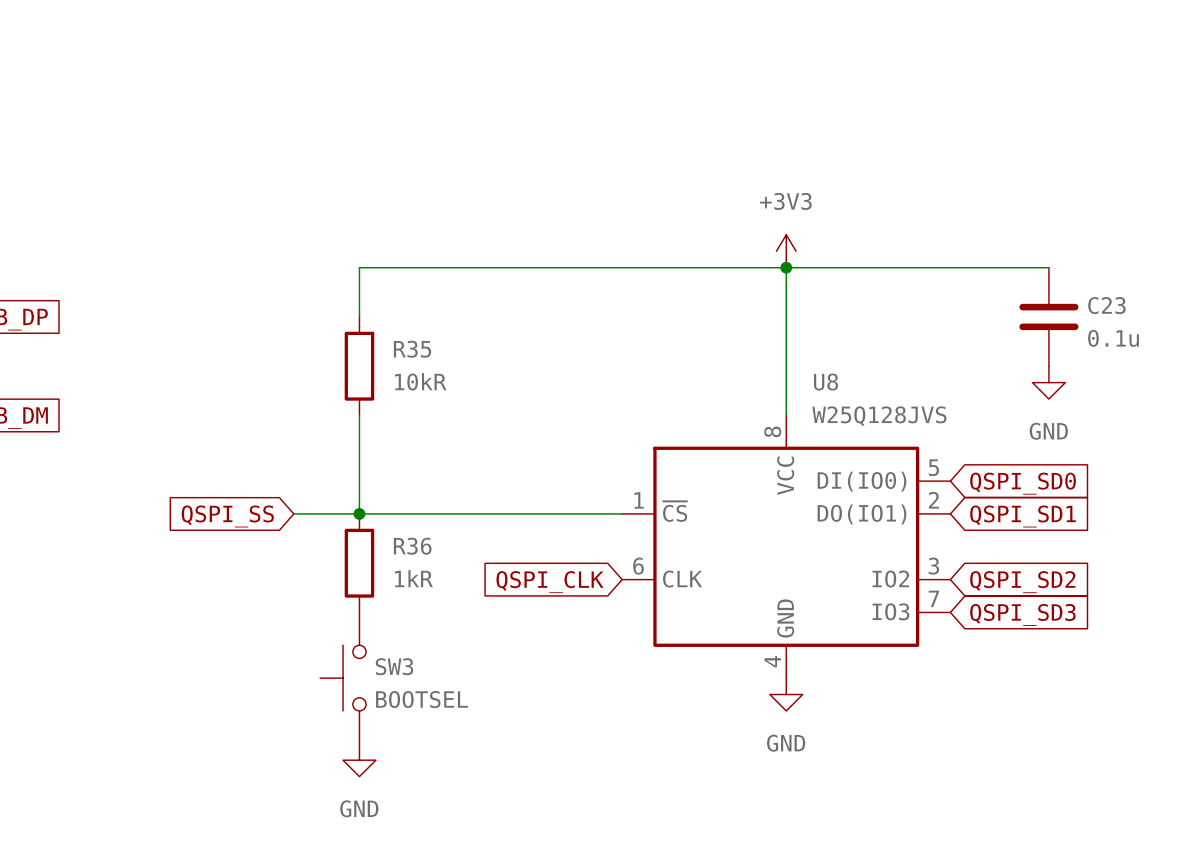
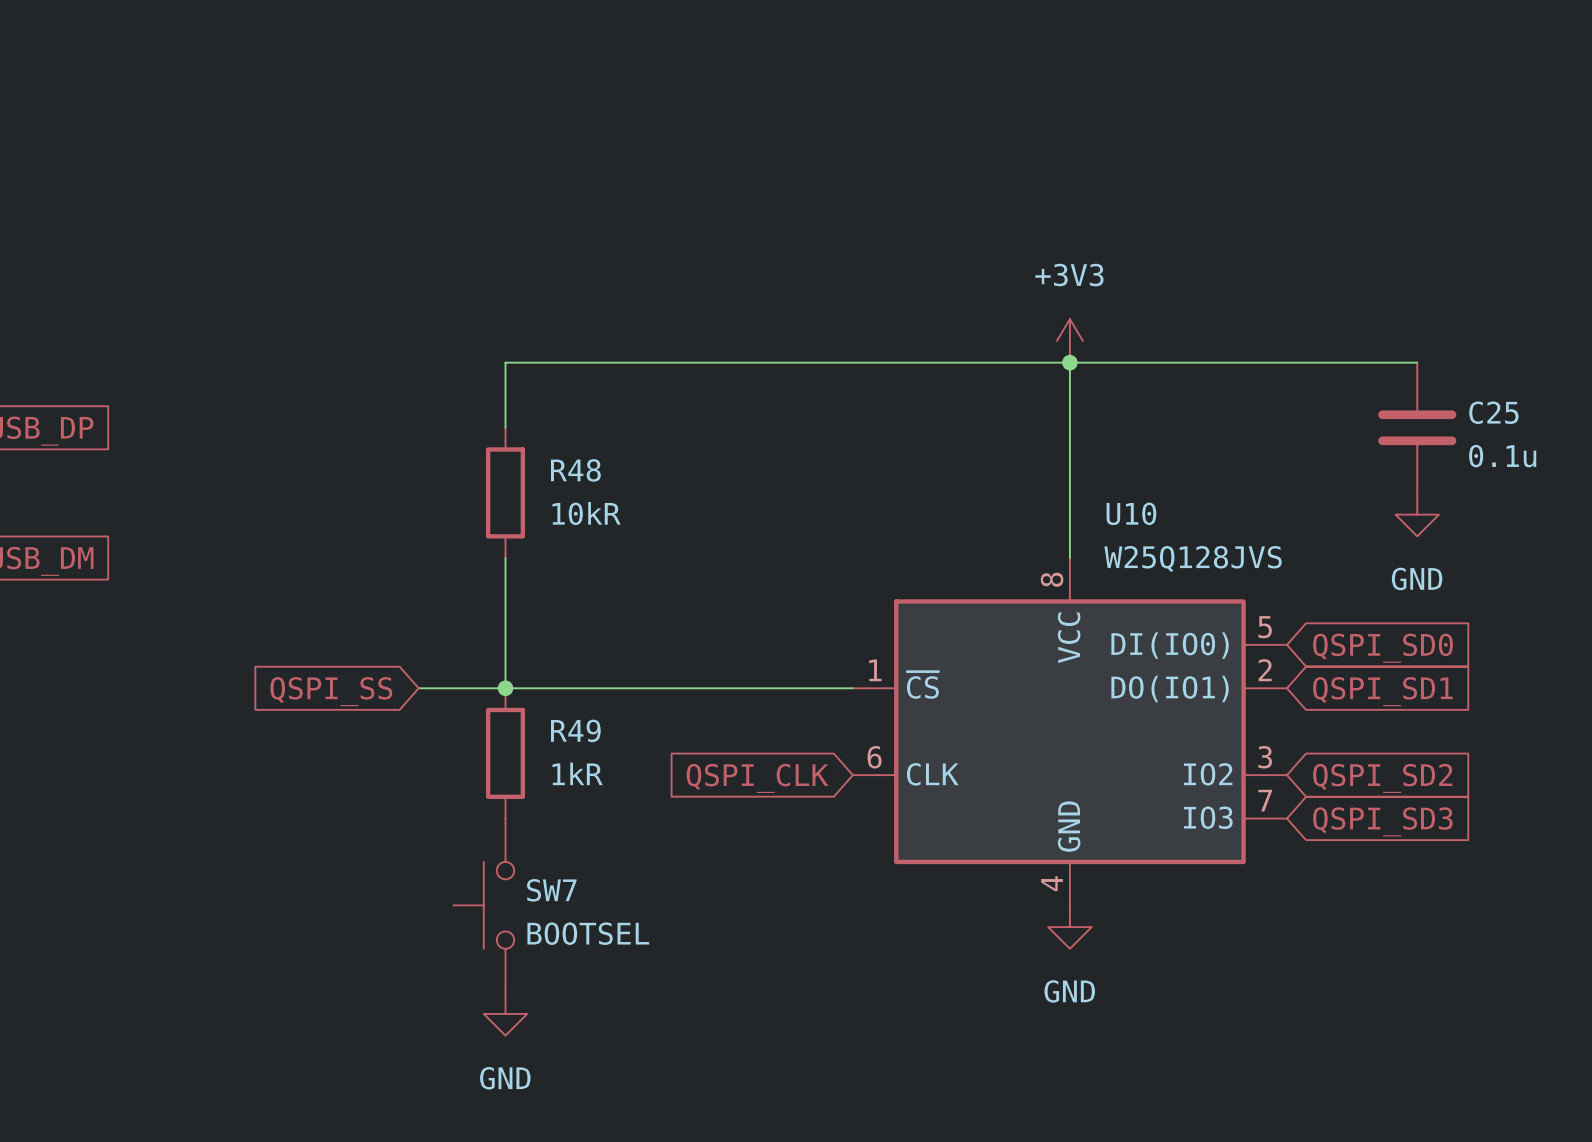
C23 name: C23 (1106, 305) -> C25 (1493, 412)
R35 name: R35 (412, 349) -> R48 (575, 470)
U8 name: U8 (826, 382) -> U10 (1131, 513)
R36 name: R36 (412, 546) -> R49 (575, 730)
SW3 name: SW3 (394, 666) -> SW7 (551, 890)

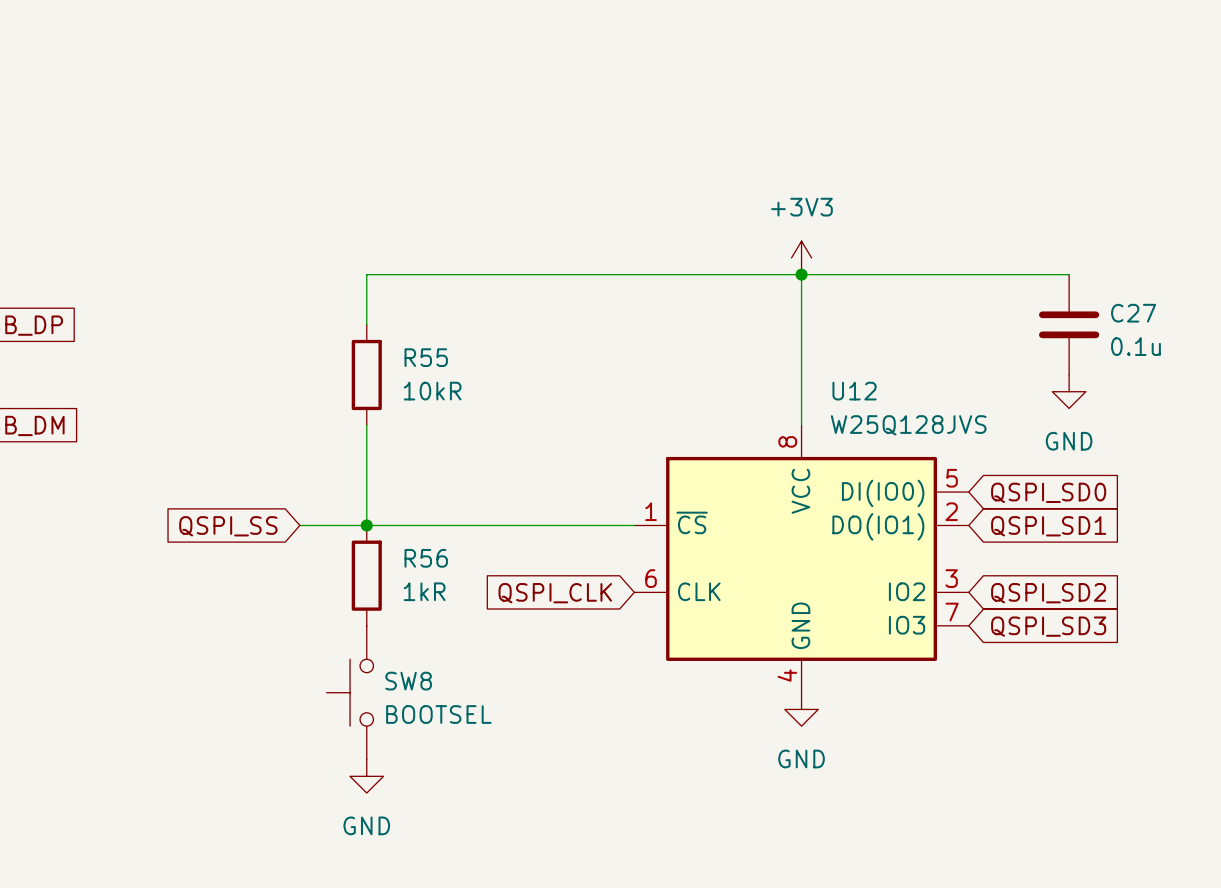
C25 name: C25 (1493, 412) -> C27 (1133, 313)
R48 name: R48 (575, 470) -> R55 (426, 357)
U10 name: U10 (1131, 513) -> U12 (854, 391)
R49 name: R49 (575, 730) -> R56 (426, 558)
SW7 name: SW7 (551, 890) -> SW8 (408, 681)

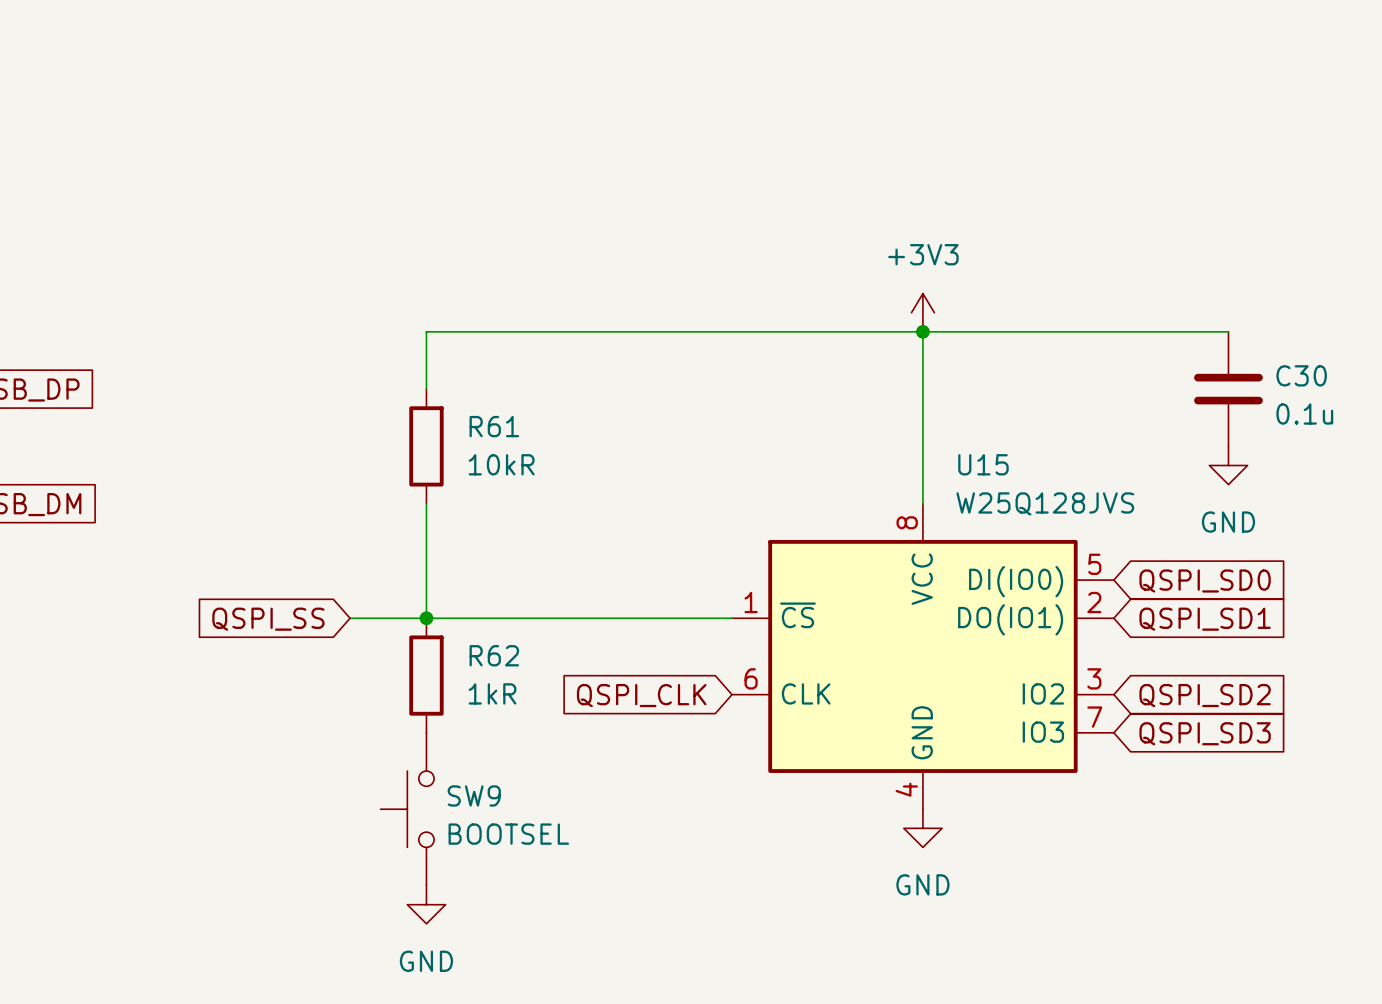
C27 name: C27 (1133, 313) -> C30 (1301, 375)
R55 name: R55 (426, 357) -> R61 (494, 426)
U12 name: U12 (854, 391) -> U15 (983, 464)
R56 name: R56 (426, 558) -> R62 (494, 655)
SW8 name: SW8 (408, 681) -> SW9 (474, 795)

